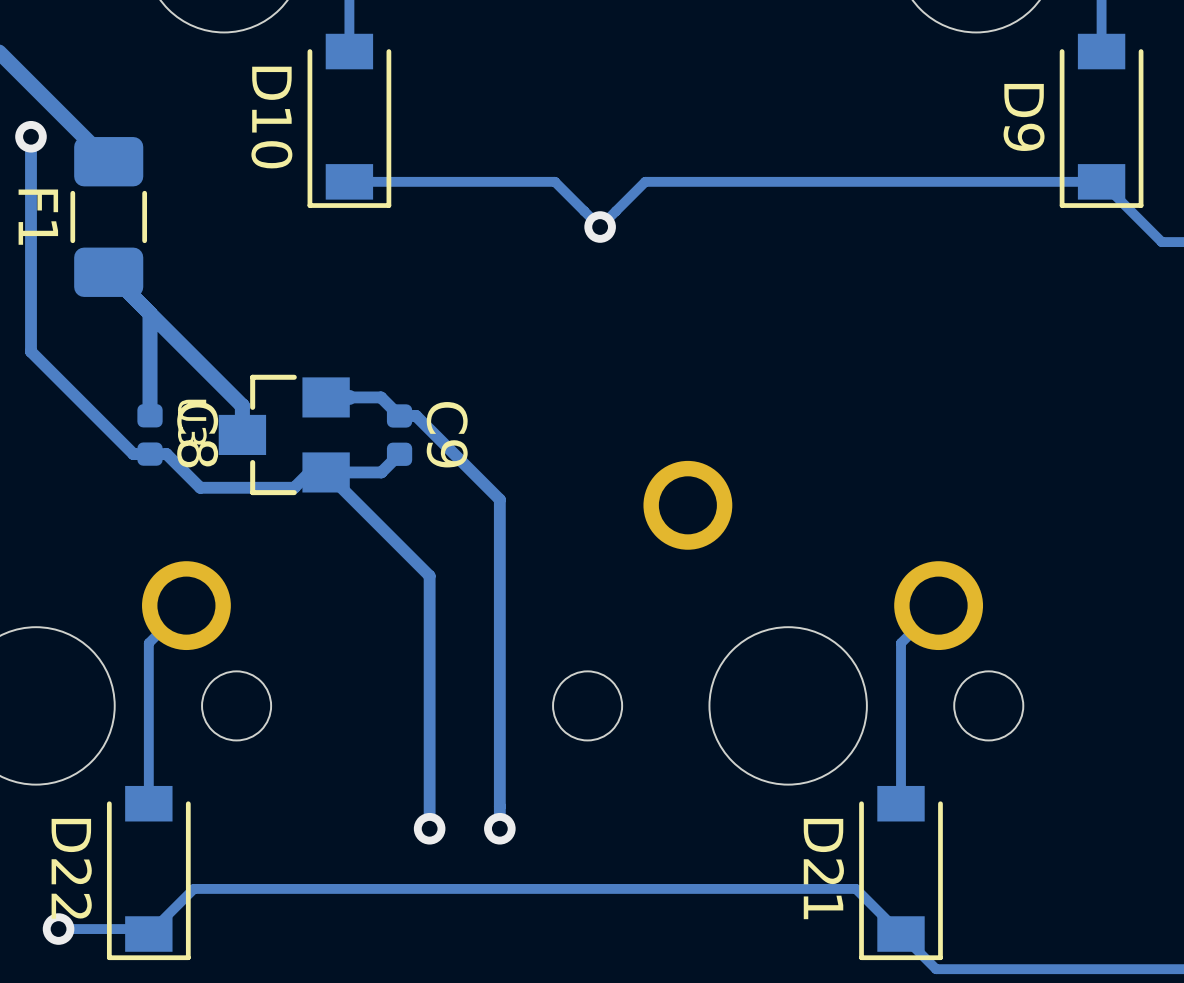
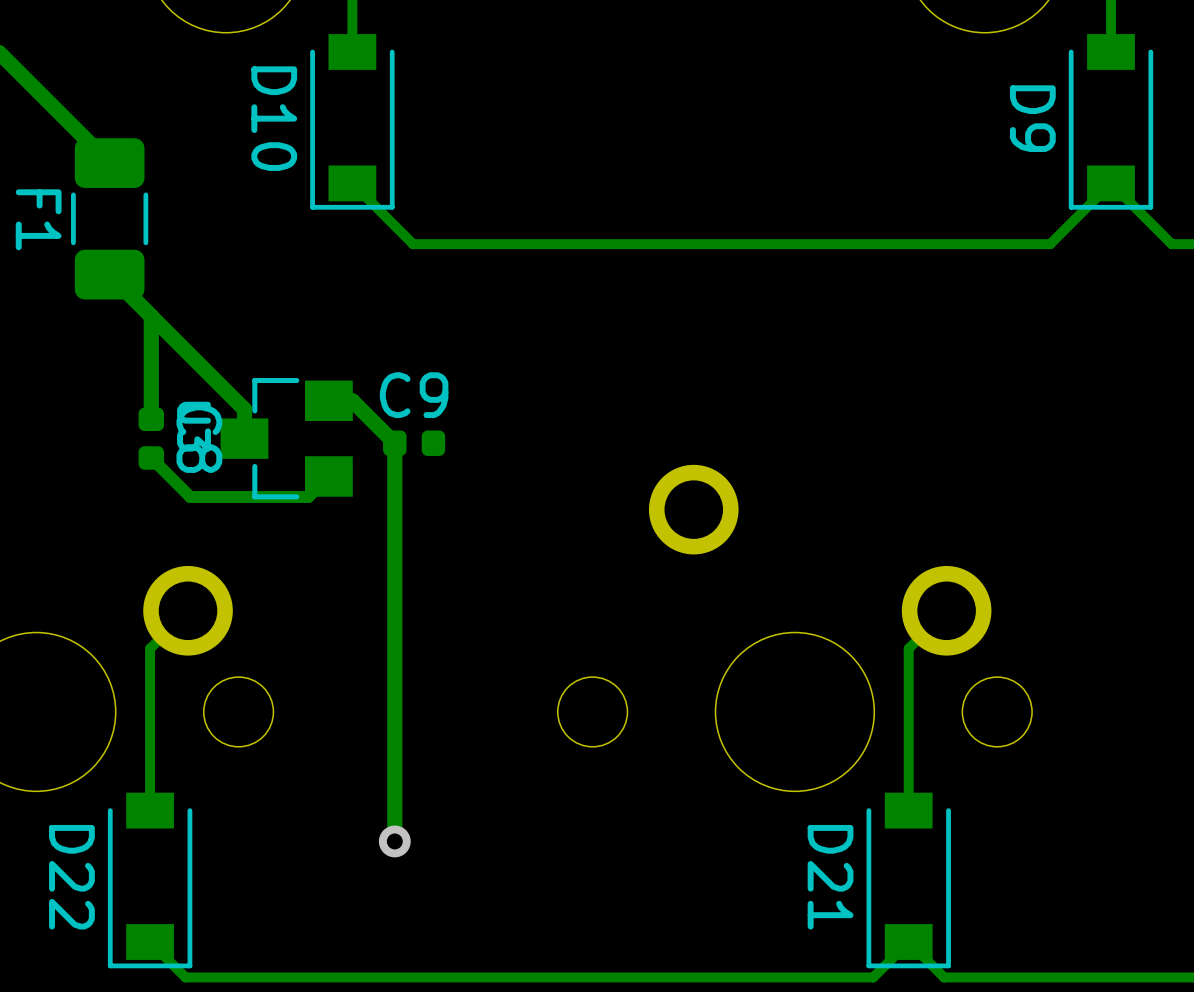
track: (30, 136) (30, 351) (133, 454) (166, 454) (200, 487) (294, 487) (309, 472) (381, 472) (399, 454) -> none
via: (30, 136) -> none
track: (1101, 181) (645, 181) (600, 227) (554, 181) (349, 181) -> (1111, 183) (1050, 244) (413, 244) (352, 183)
via: (600, 227) -> none
track: (326, 397) (381, 397) (399, 415) (416, 415) (499, 499) (499, 828) -> none
track: none -> (352, 400) (394, 443) (394, 841)
C9 rotation: 0° (399, 435) -> 90° clockwise (414, 443)
track: (326, 472) (429, 575) (429, 828) -> (328, 476) (308, 497) (190, 497) (151, 457)
via position: (429, 828) -> (394, 841)
via: (499, 828) -> none
track: (58, 929) (143, 929) (148, 934) (193, 888) (855, 888) (901, 934) -> (150, 942) (185, 977) (873, 977) (908, 942)
via: (58, 929) -> none

